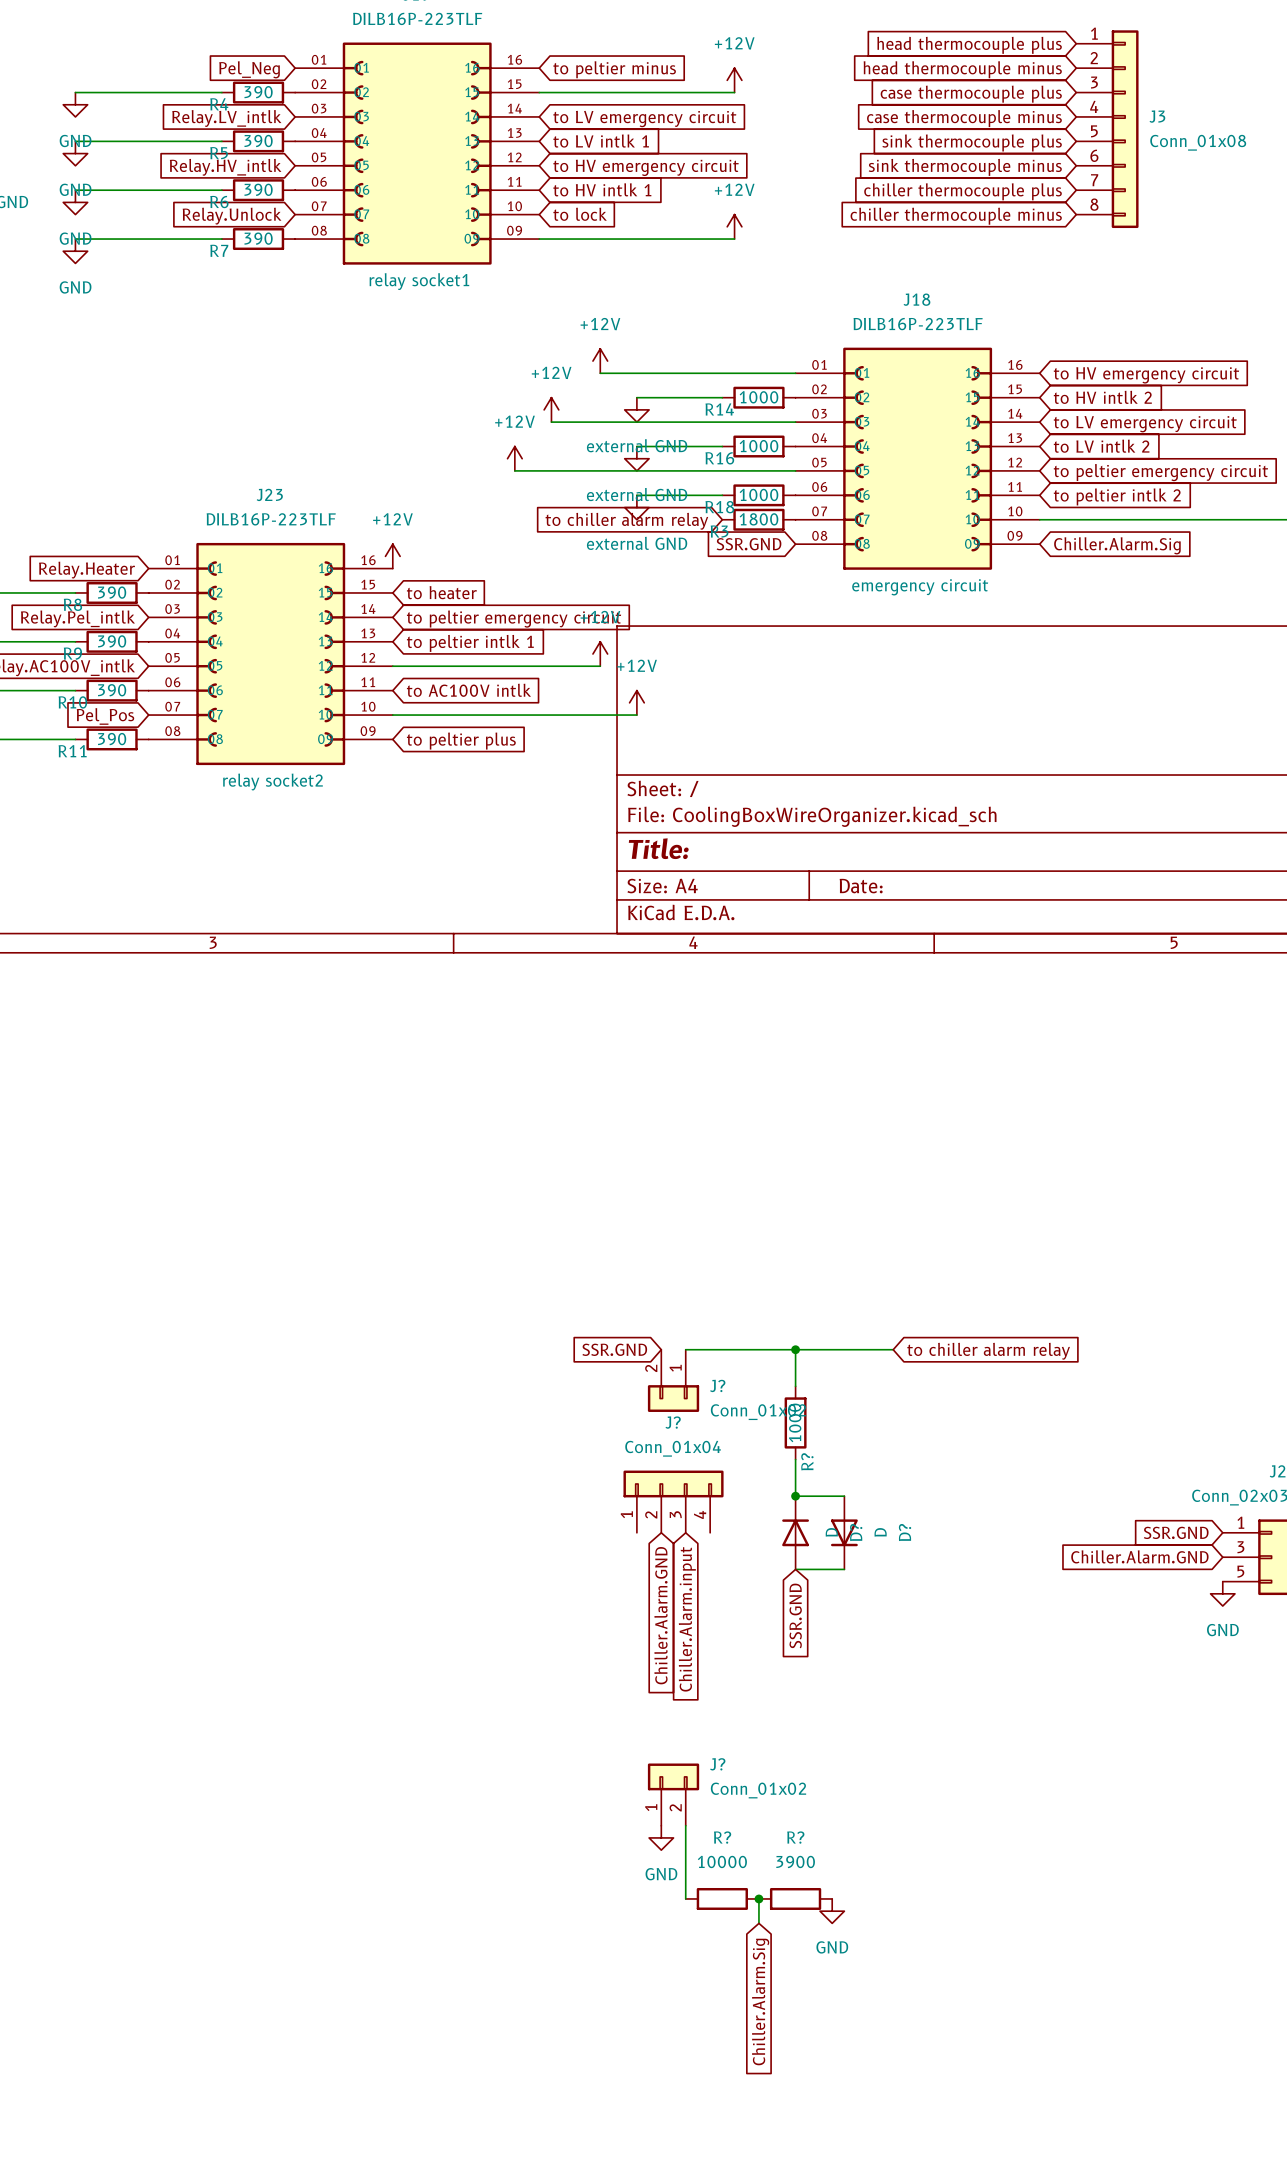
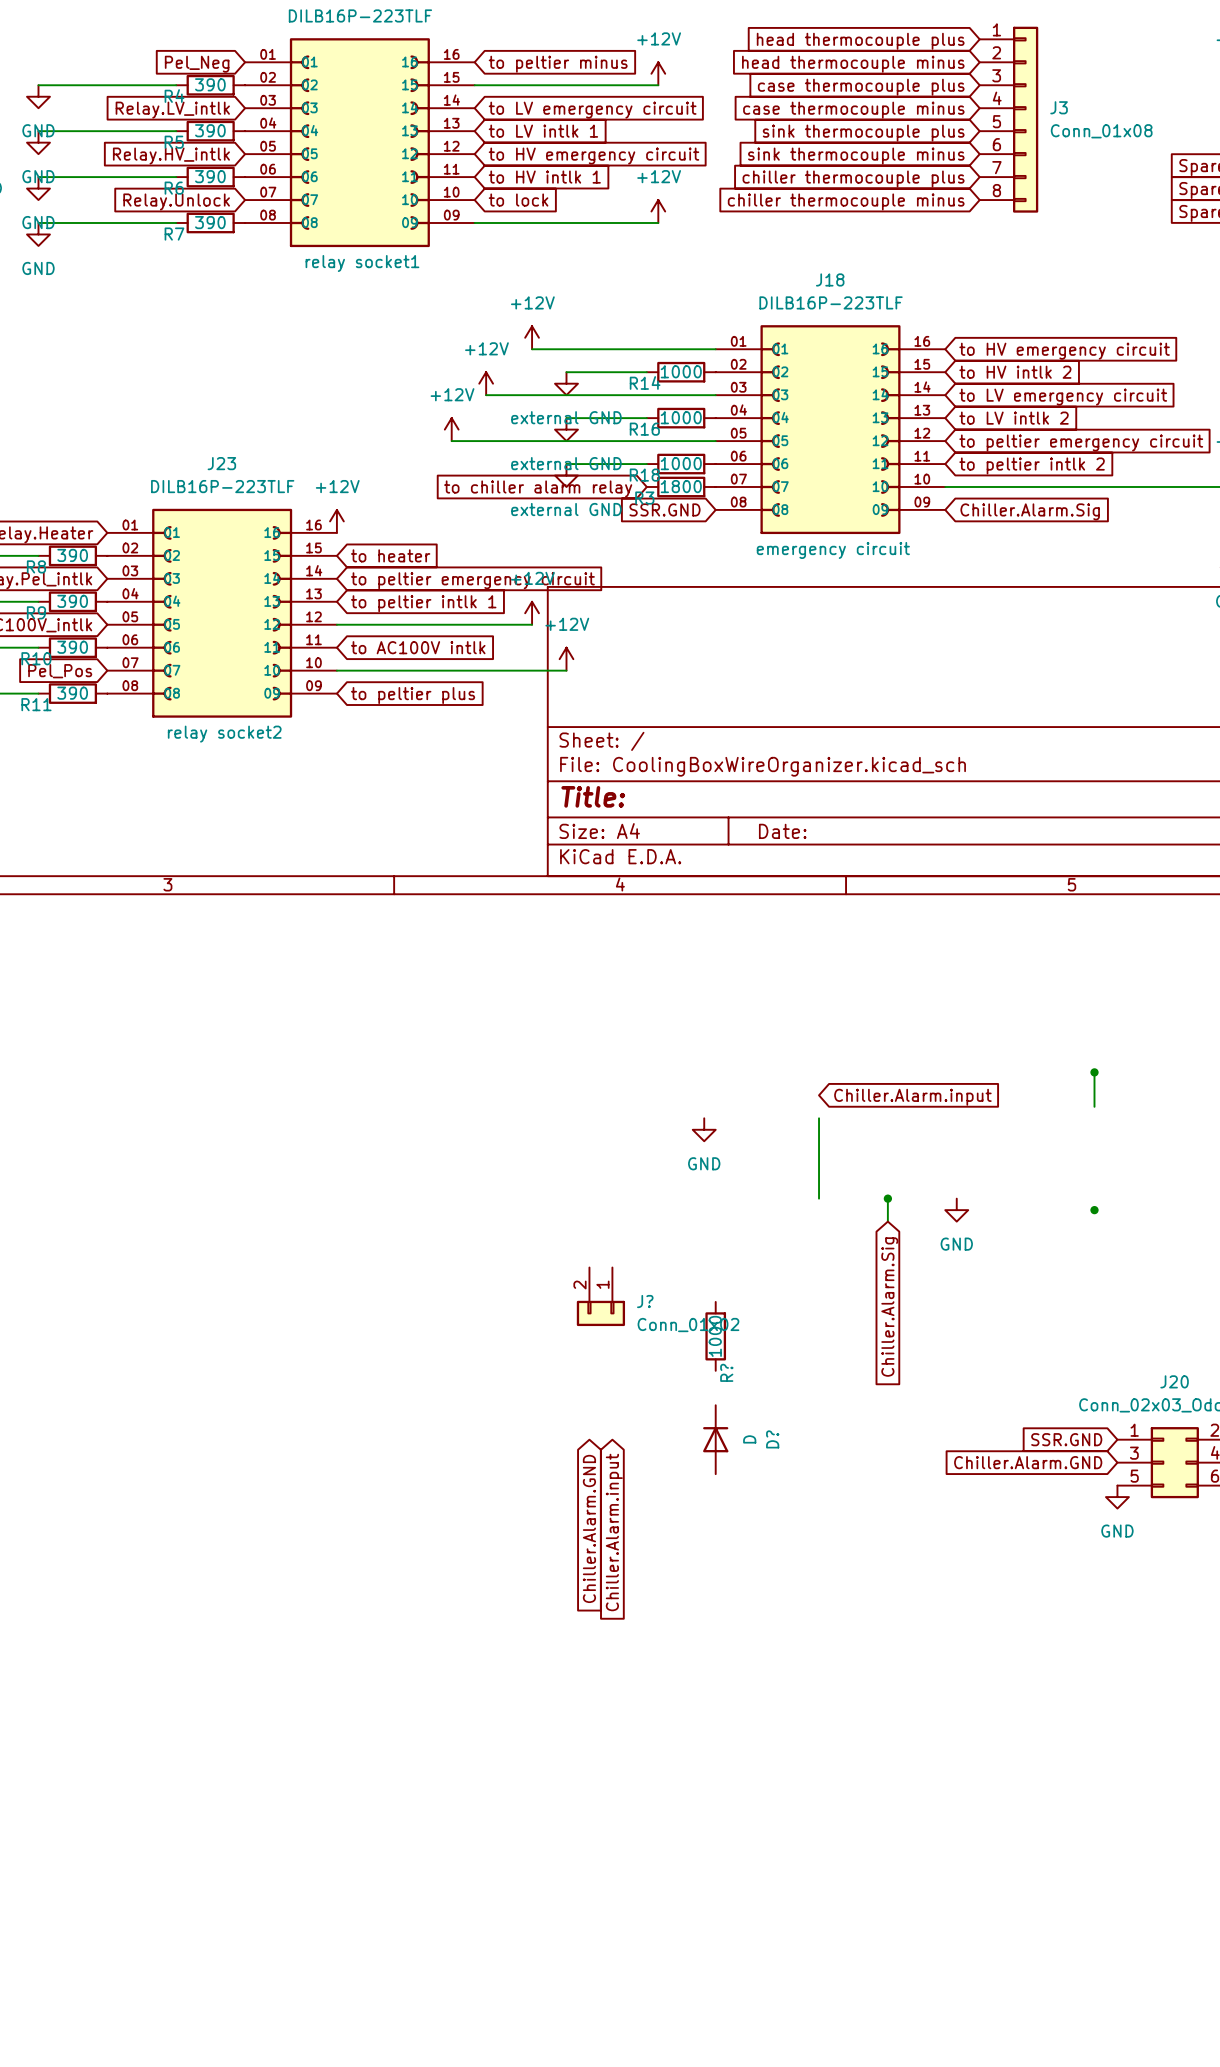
wire: none -> (1094, 1072) (1094, 1106)
junction: none -> (1094, 1072)
global label: none -> Chiller.Alarm.input (912, 1097)
wire: none -> (819, 1118) (819, 1198)
power symbol: none -> GND (704, 1129)
wire: none -> (887, 1198) (887, 1221)
junction: none -> (887, 1198)
power symbol: none -> GND (956, 1210)
junction: none -> (1094, 1210)
global label: SSR.GND (614, 1349) -> none
wire: (685, 1349) (893, 1349) -> none
wire: (795, 1349) (795, 1386) -> none
junction: (795, 1349) -> none
global label: to chiller alarm relay (988, 1351) -> none
global label: none -> Chiller.Alarm.Sig (889, 1307)
wire: (795, 1459) (795, 1496) (844, 1496) -> none
junction: (795, 1496) -> none
J?: Conn_01x04 (673, 1501) -> none
D?: D (844, 1532) -> none
wire: (795, 1569) (844, 1569) -> none
global label: SSR.GND (795, 1615) -> none
J?: Conn_01x02 (673, 1794) -> none
wire: (685, 1825) (685, 1898) -> none
power symbol: GND (661, 1837) -> none
R?: 10000 (722, 1898) -> none
wire: (758, 1898) (758, 1923) -> none
junction: (758, 1898) -> none
R?: 3900 (795, 1898) -> none
power symbol: GND (832, 1911) -> none
global label: Chiller.Alarm.Sig (760, 2002) -> none

